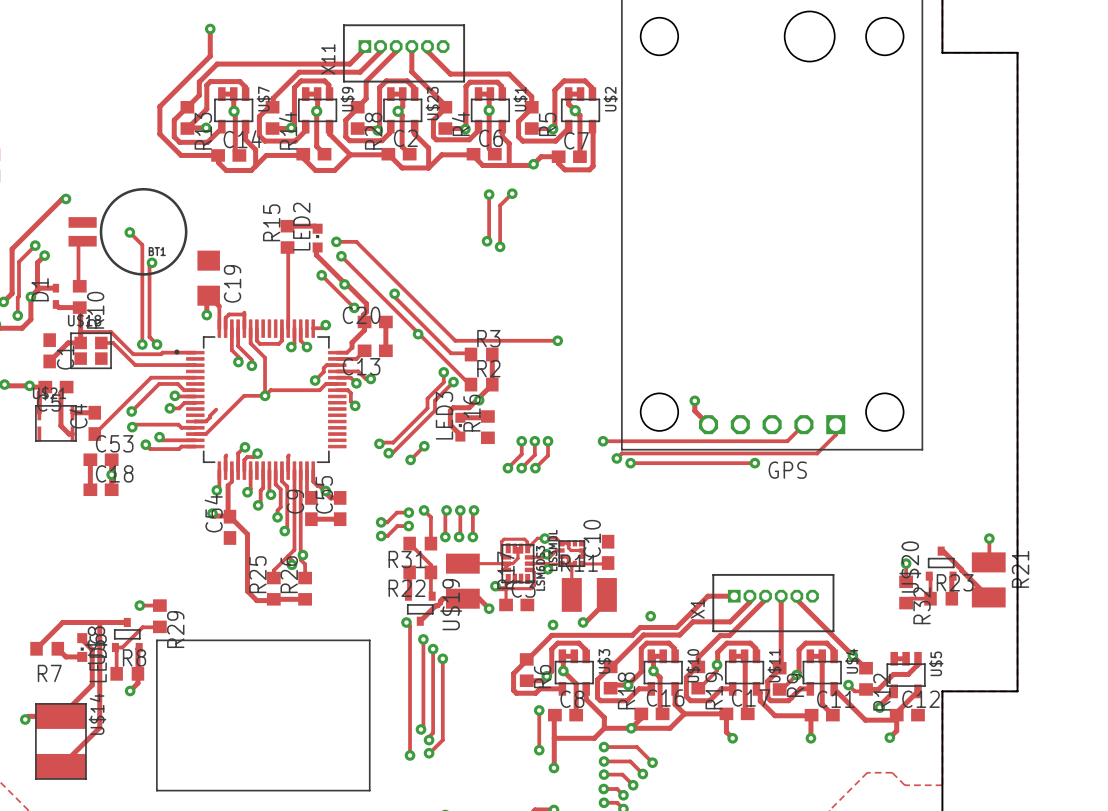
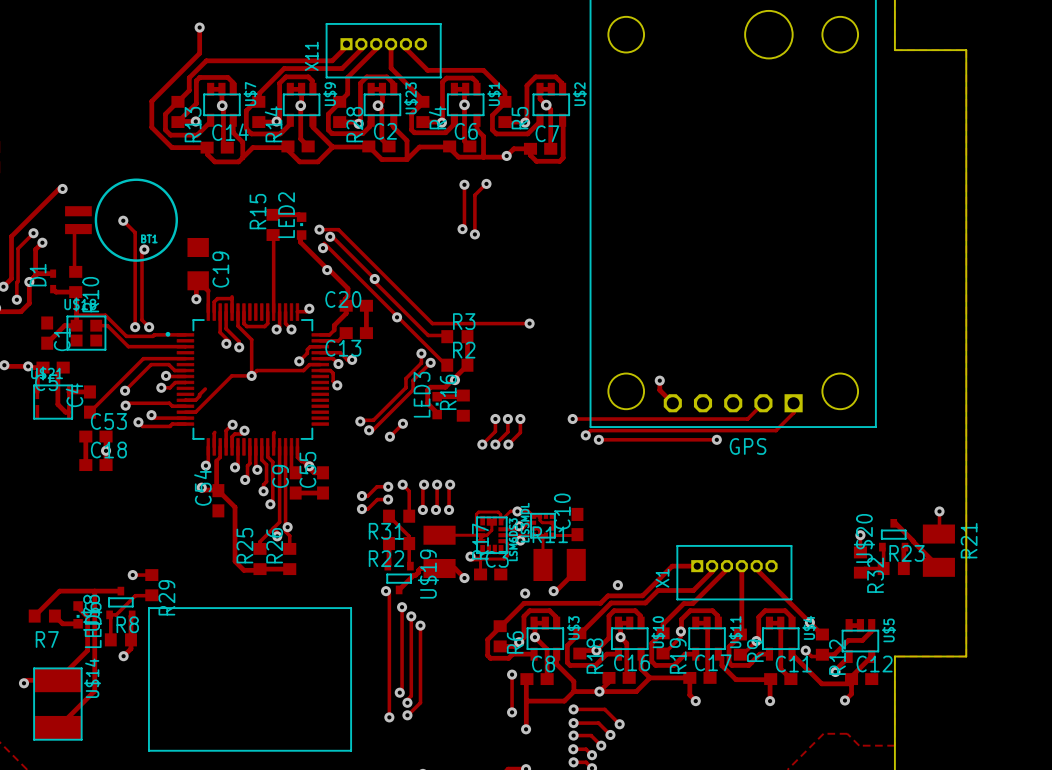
track: none -> (330, 236) (332, 236) (374, 279)
via: none -> (330, 236)
via: (341, 256) -> none
via: none -> (323, 248)
track: (321, 275) (354, 307) -> none
via: (321, 275) -> none
via: (354, 307) -> none

